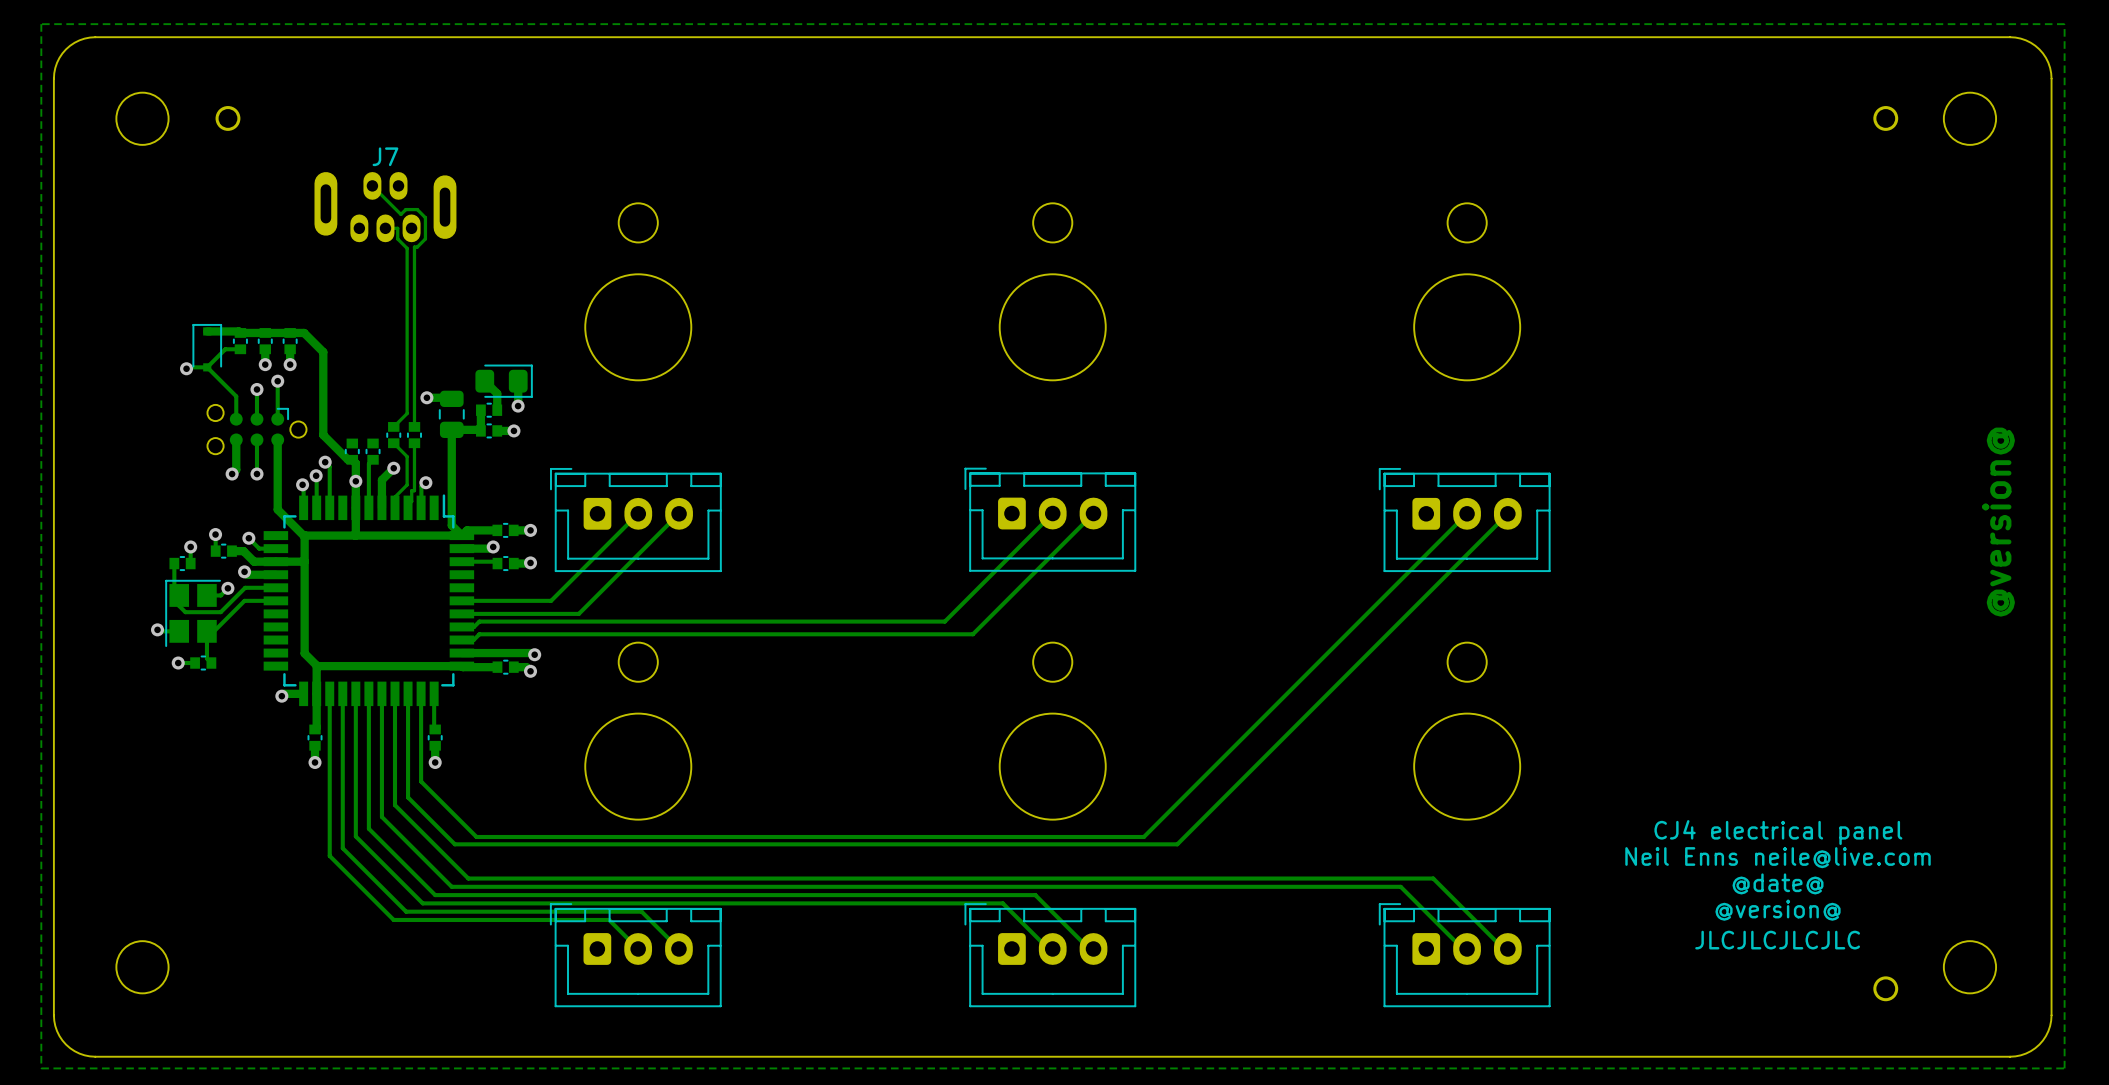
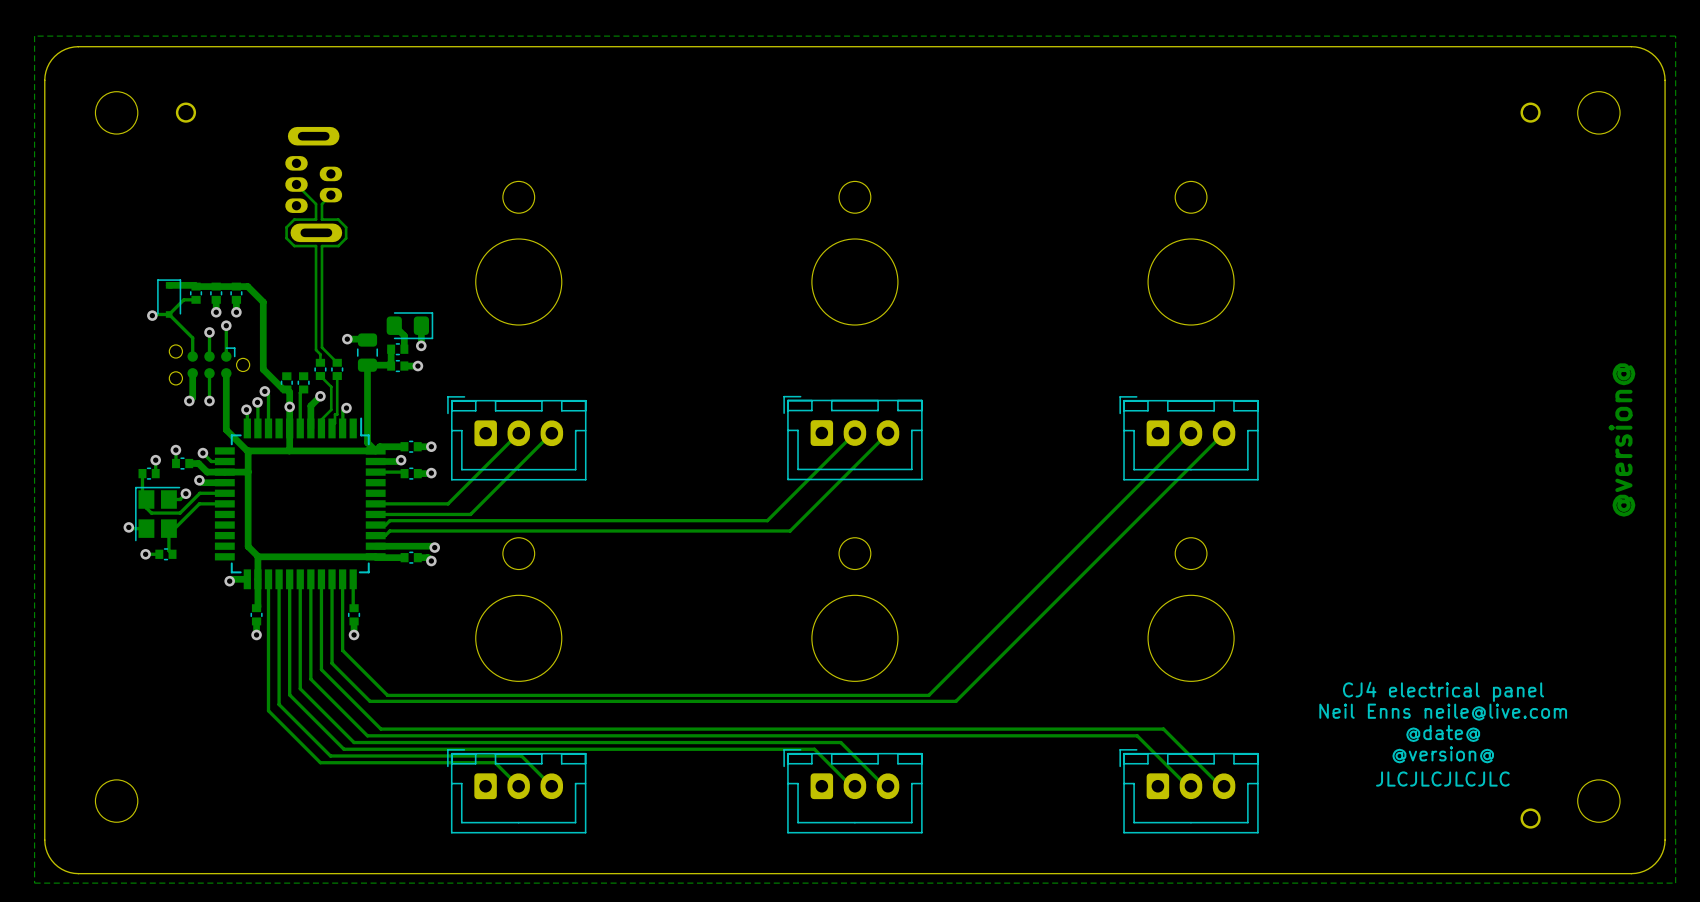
track: (372, 185) (400, 214) (405, 209) (417, 209) (425, 217) (425, 238) (417, 247) (414, 247) (414, 426) -> (330, 195) (321, 204) (321, 219) (338, 219) (346, 227) (346, 238) (338, 246) (321, 246) (321, 347) (337, 362)
J7 side: bottom (385, 207) -> top (313, 184)
track: (385, 228) (397, 228) (397, 238) (407, 248) (407, 413) (393, 426) -> (296, 184) (316, 204) (316, 219) (294, 219) (286, 227) (286, 238) (294, 246) (316, 246) (316, 349) (320, 354) (320, 362)

